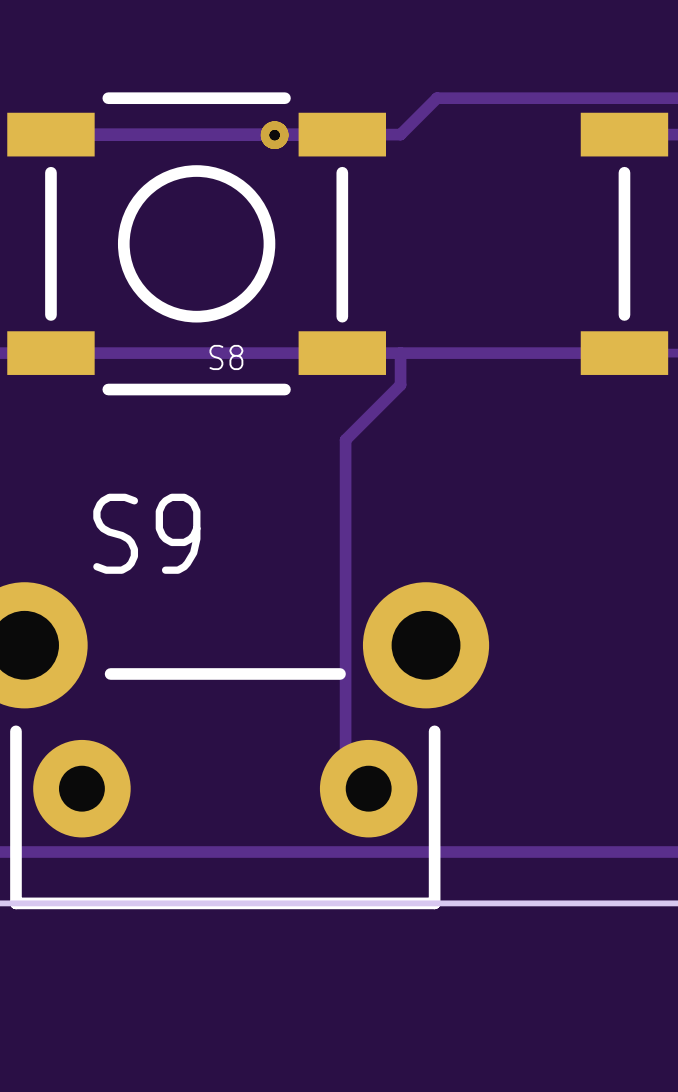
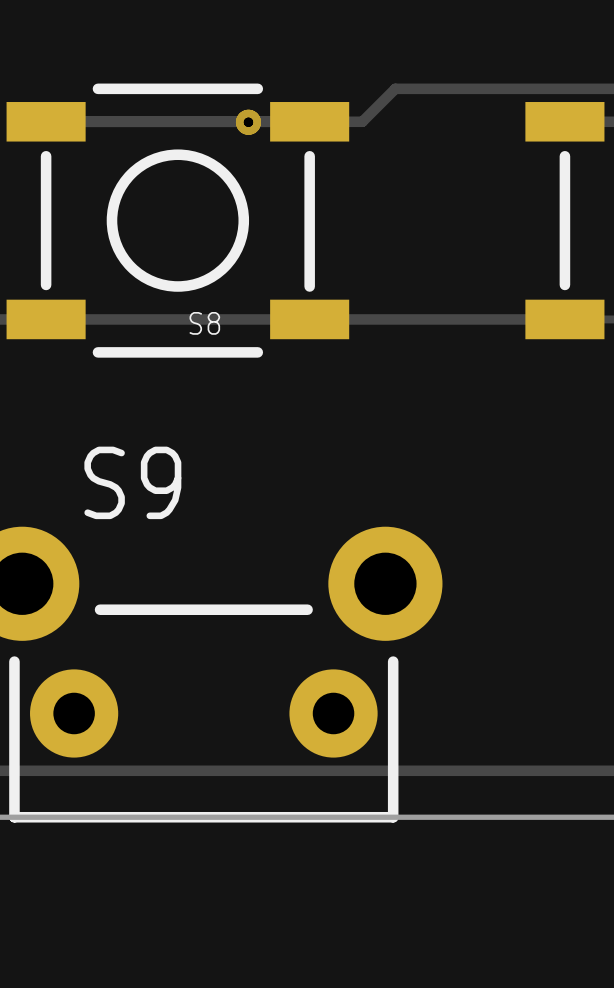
track: (400, 353) (400, 384) (345, 439) (345, 765) (368, 788) -> none

